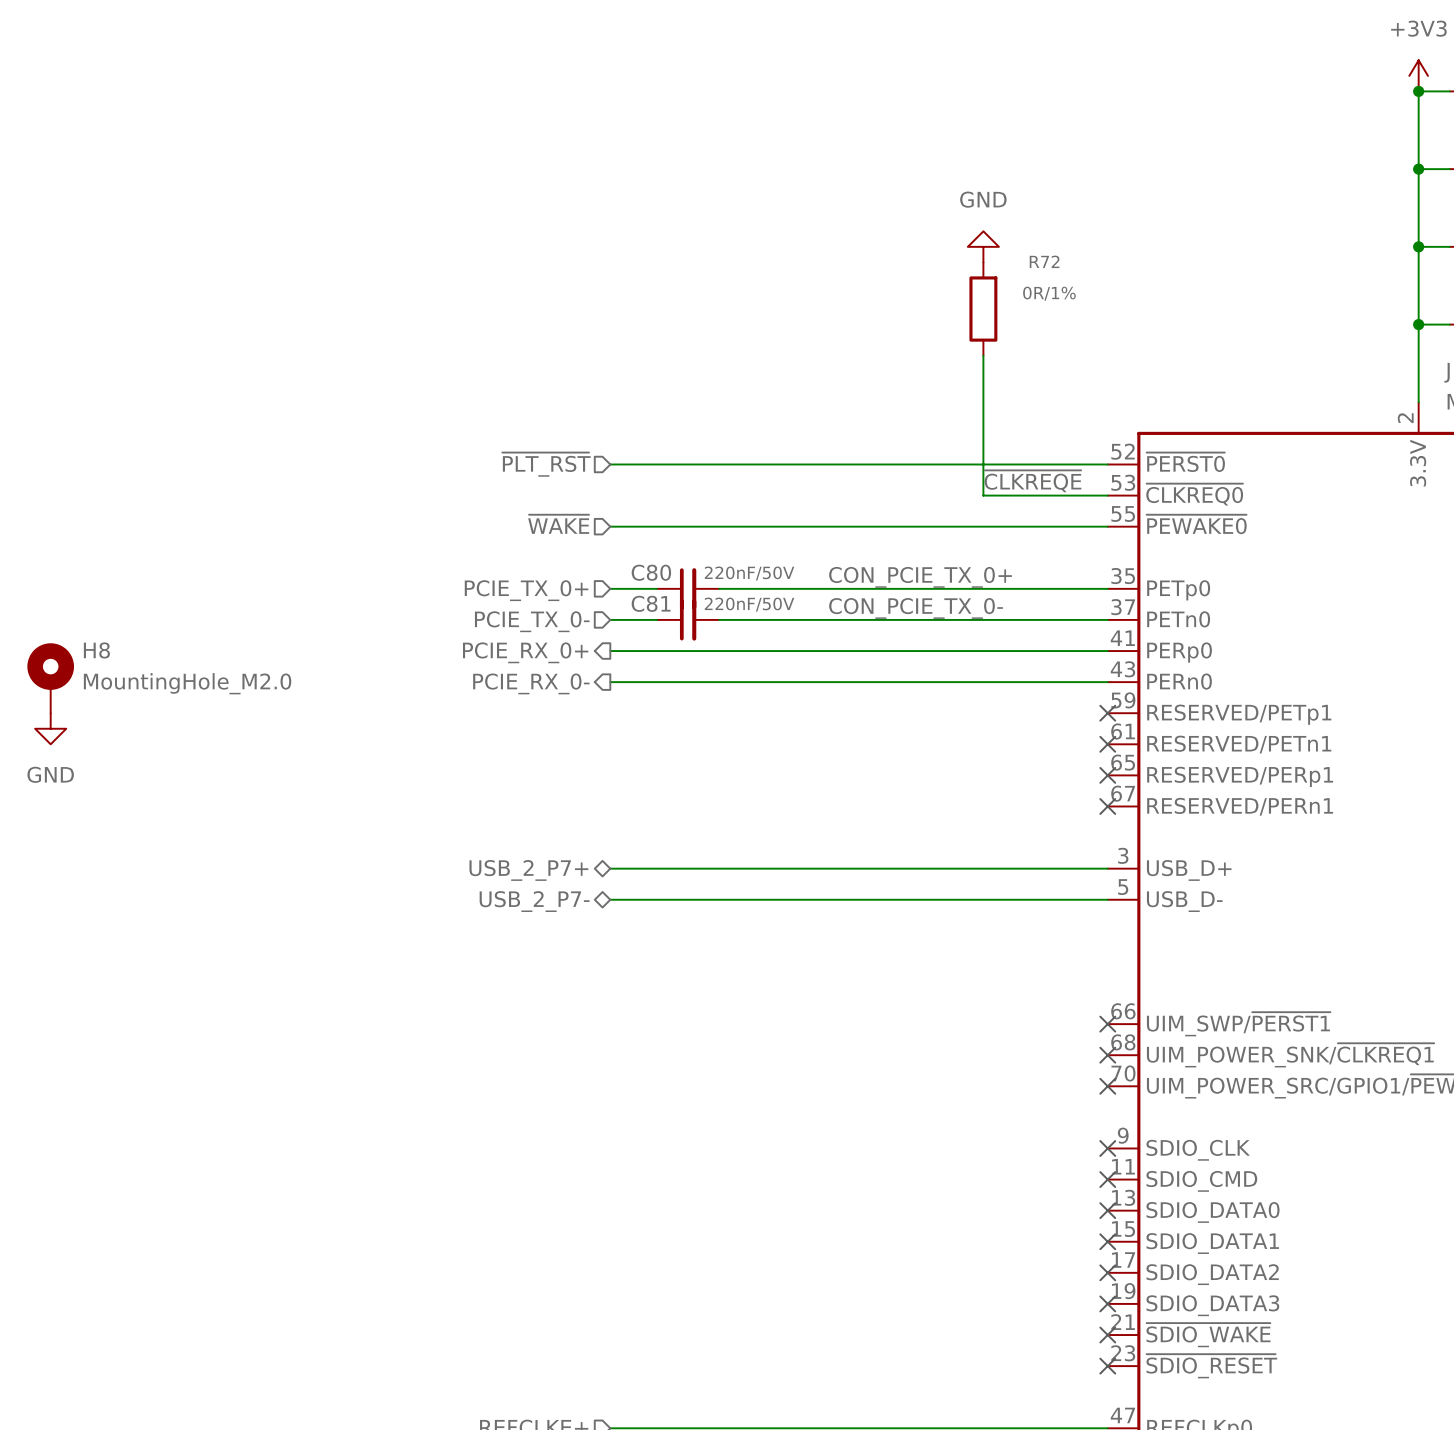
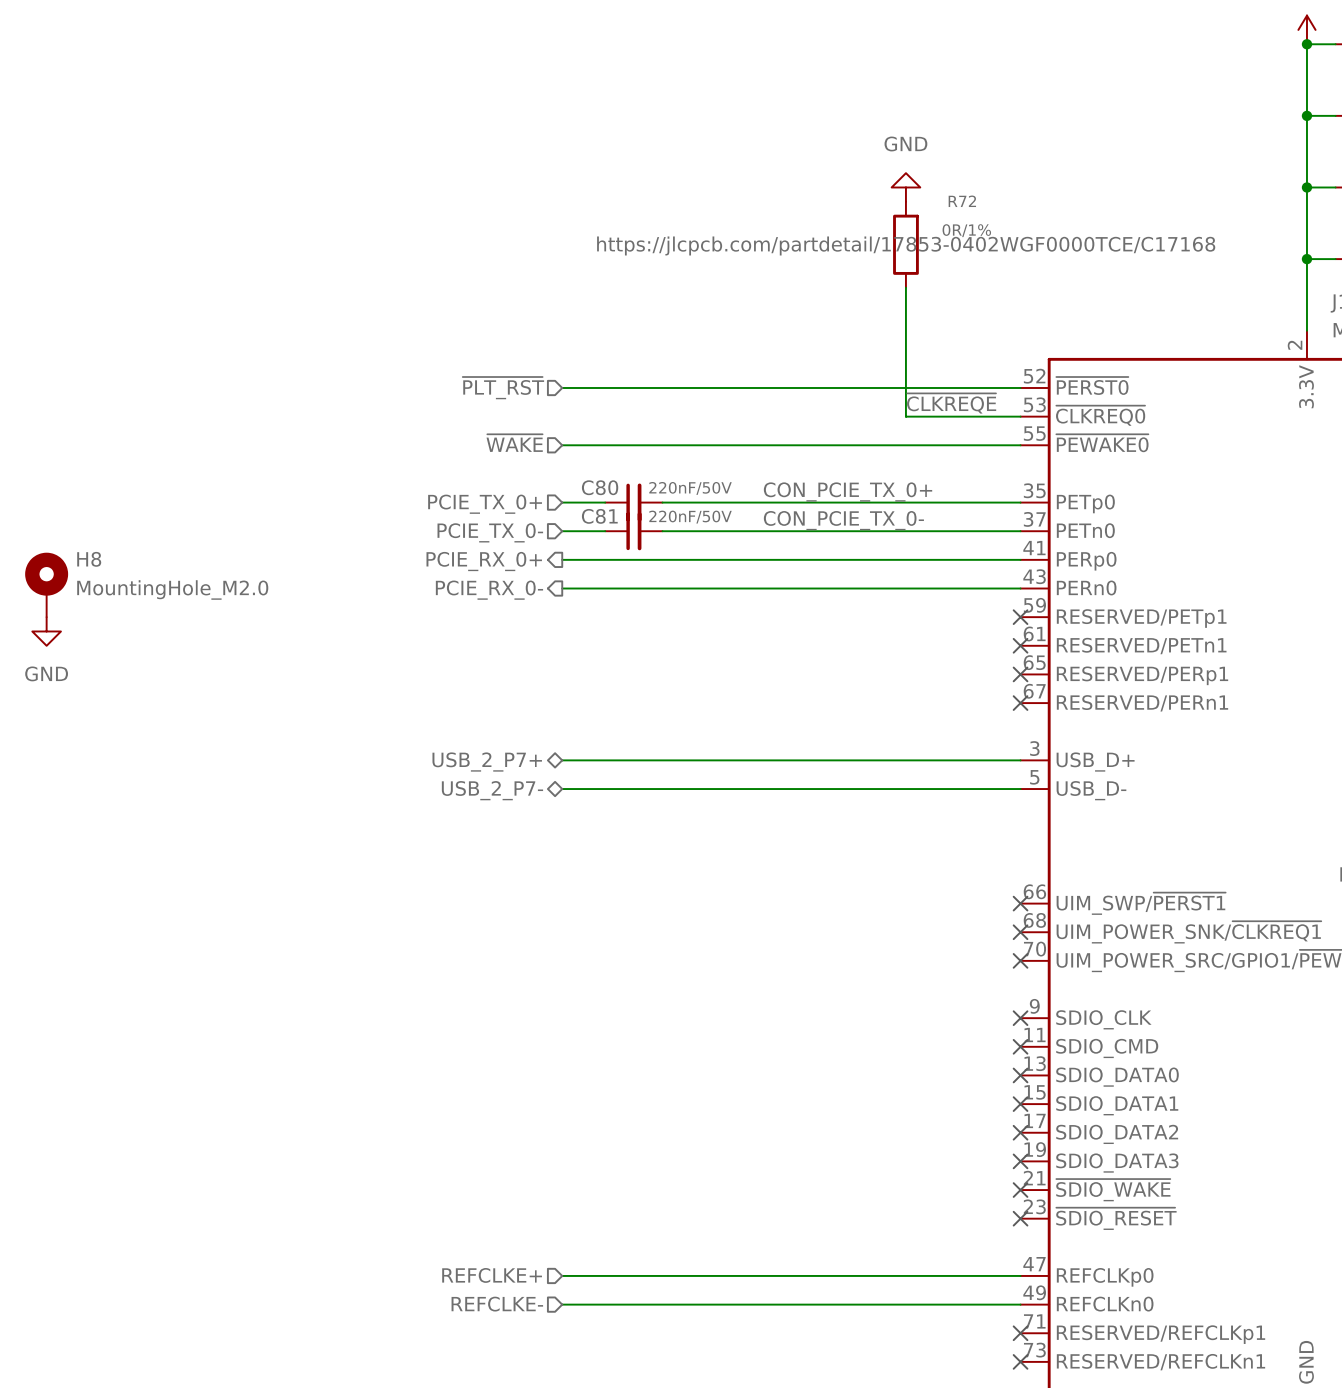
R72 text: none -> https://jlcpcb.com/partdetail/17853-0402WGF0000TCE/C17168 (906, 245)

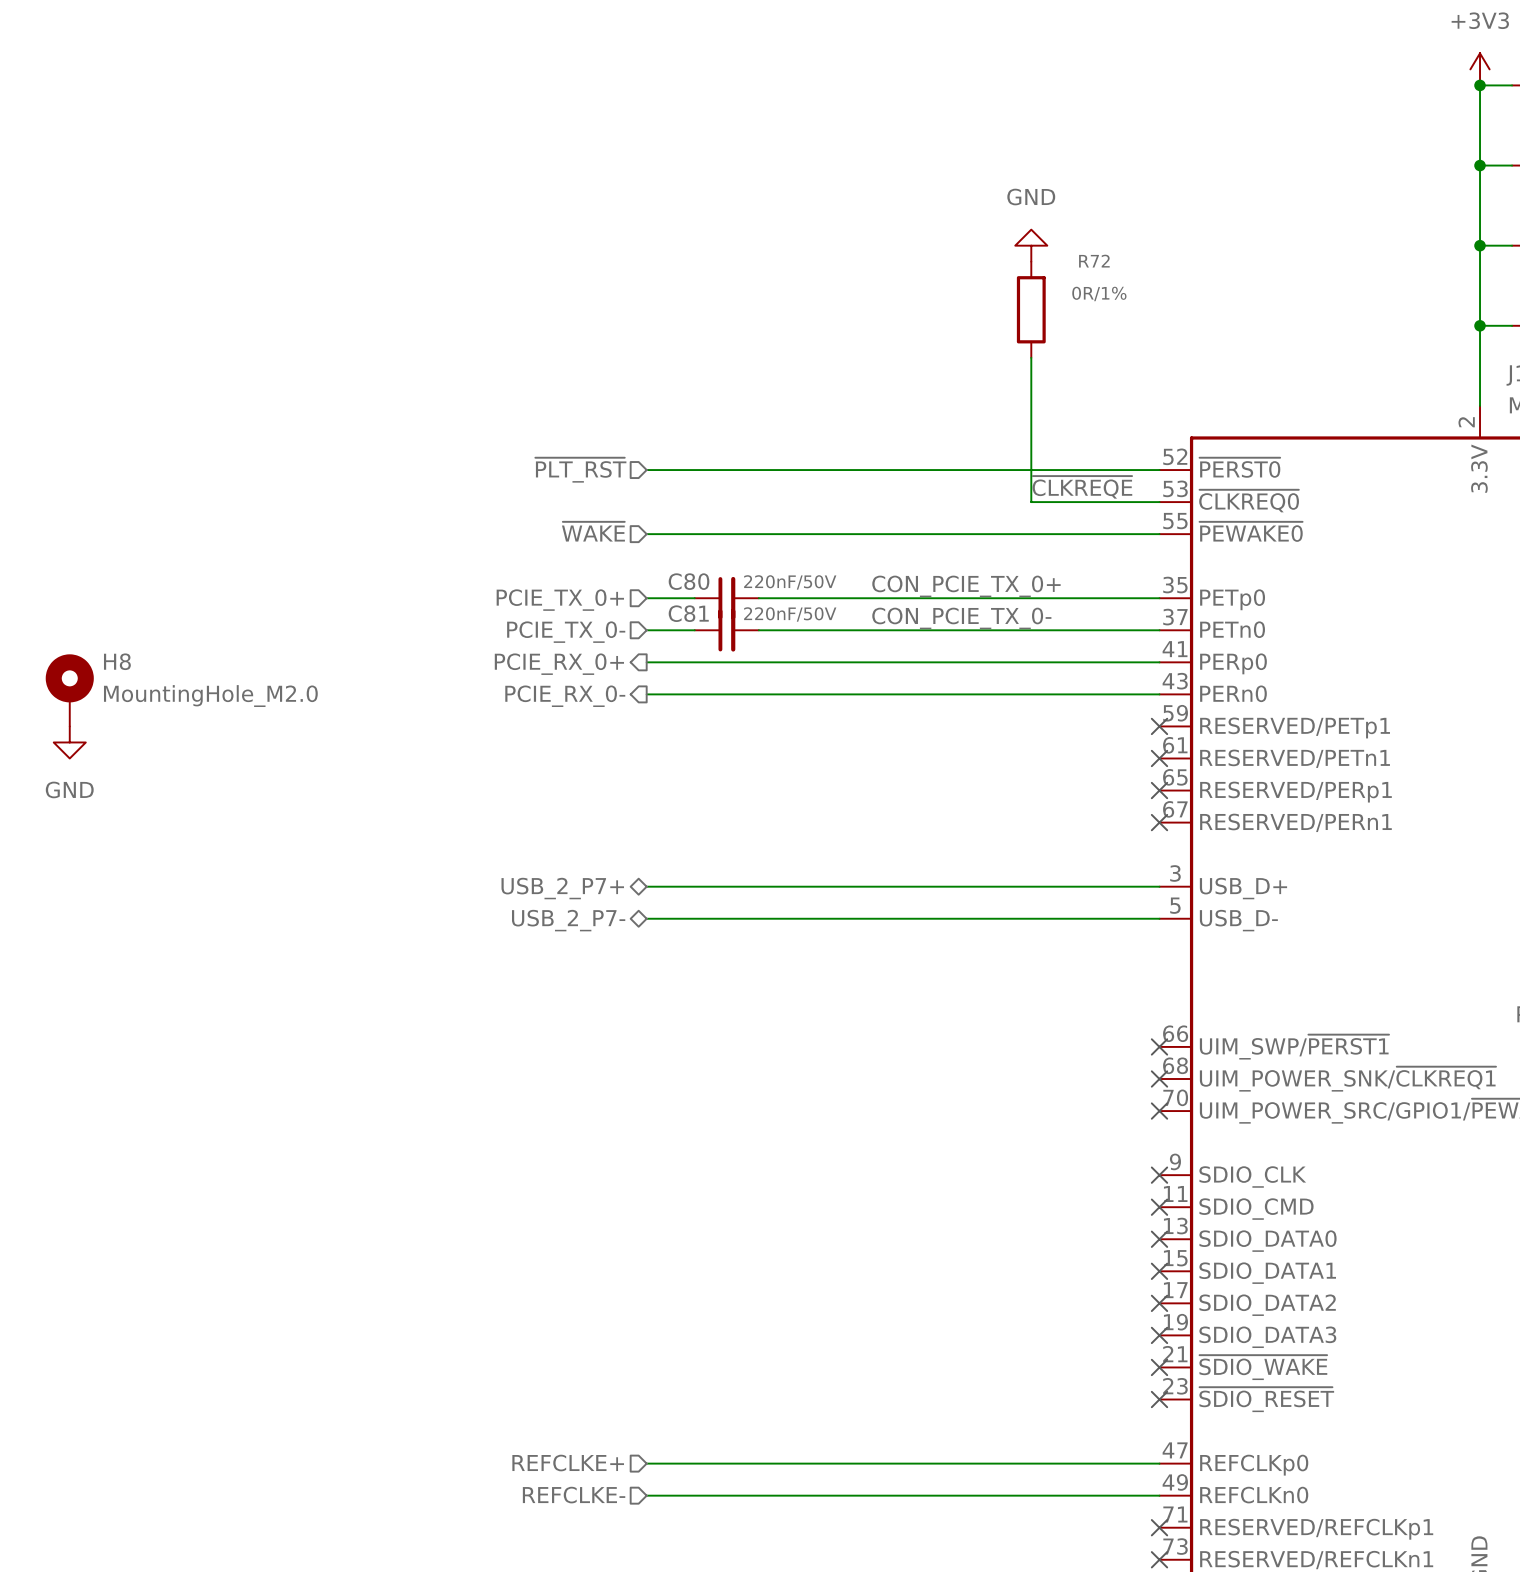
R72 text: https://jlcpcb.com/partdetail/17853-0402WGF0000TCE/C17168 (906, 245) -> none

